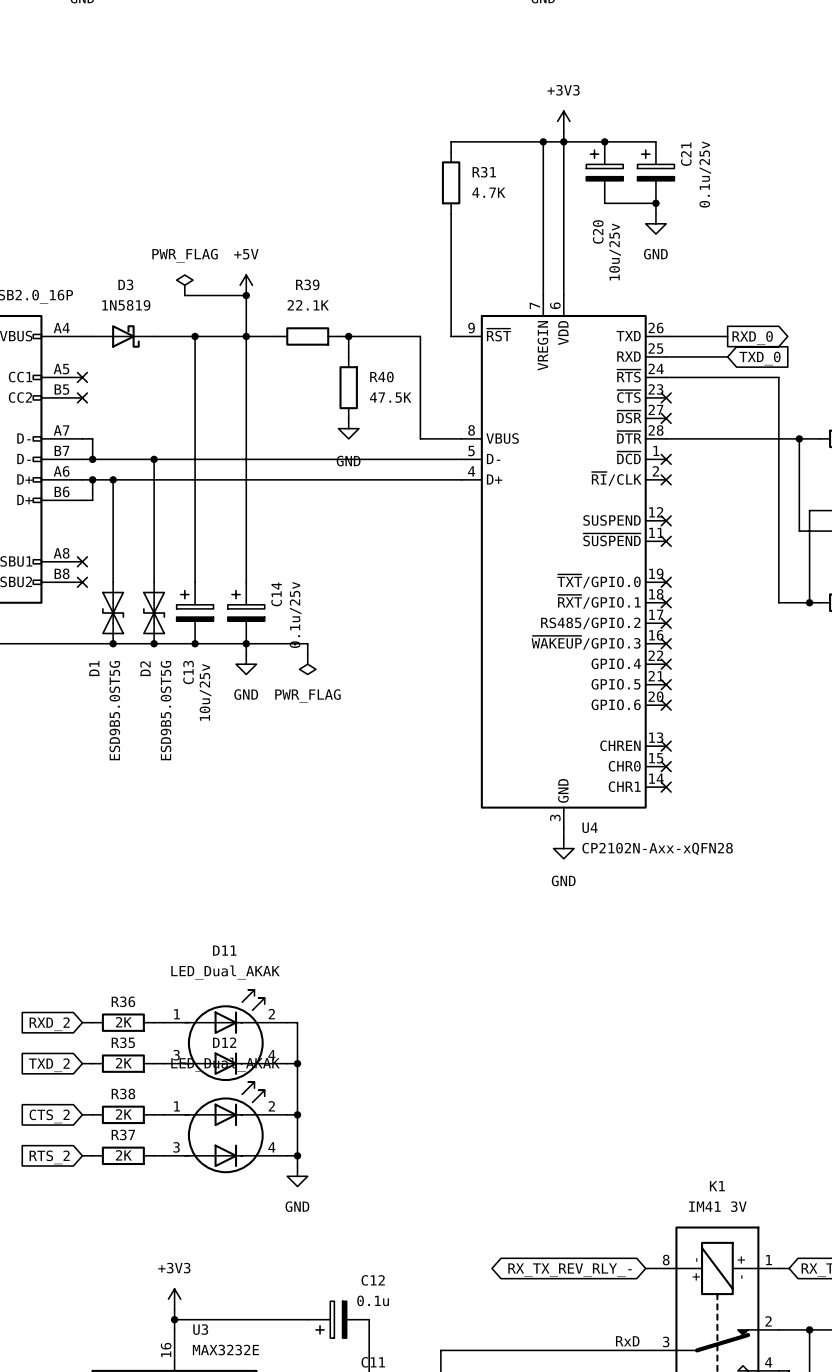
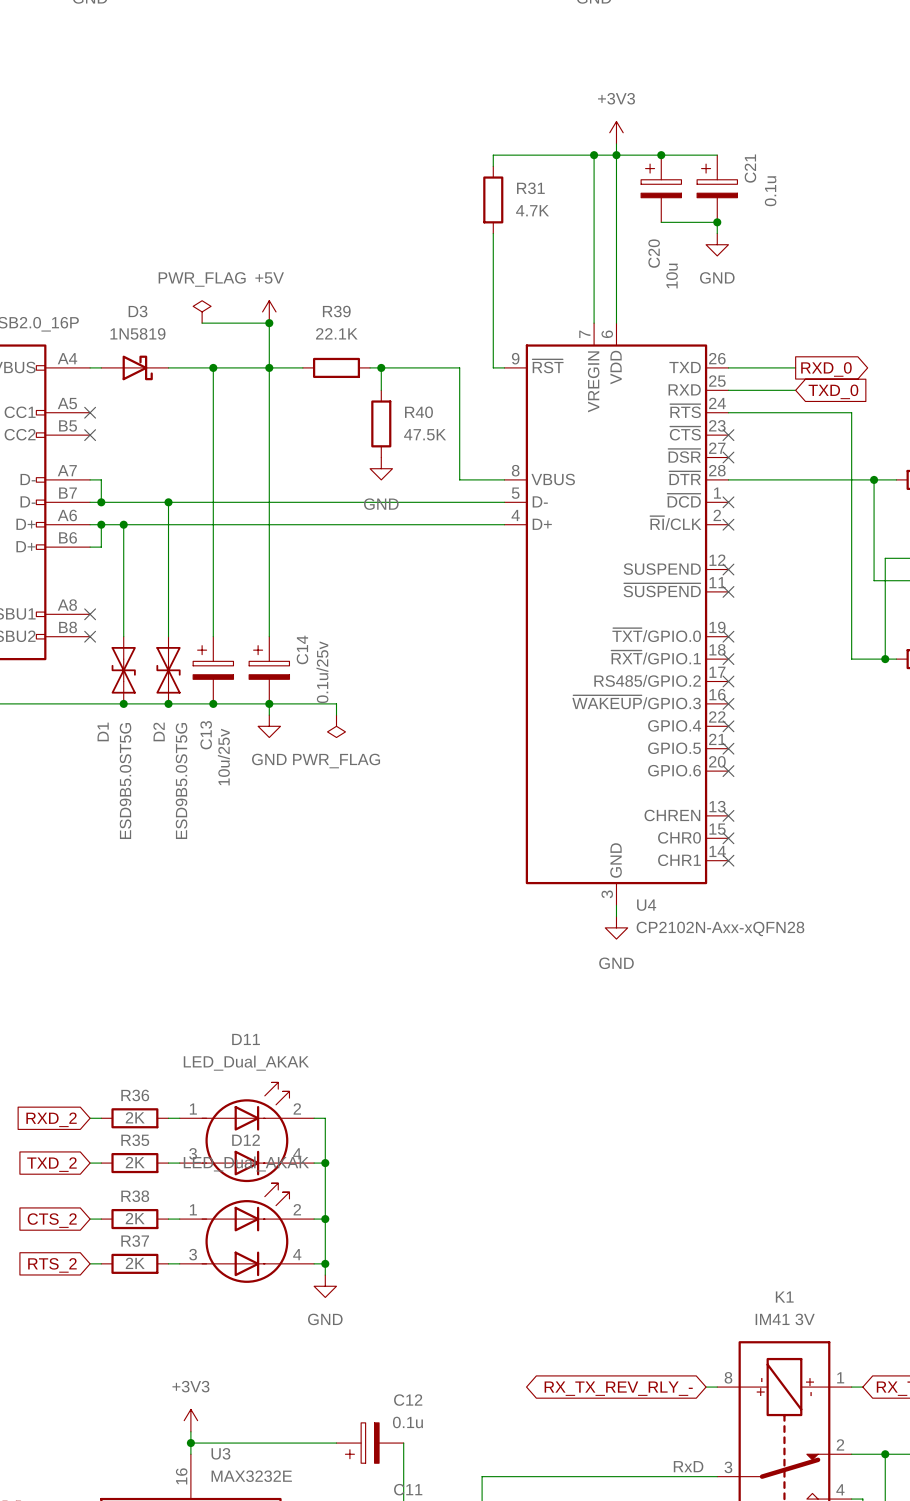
C21 value: 0.1u/25v (705, 174) -> 0.1u (770, 191)
C20 value: 10u/25v (615, 251) -> 10u (672, 276)

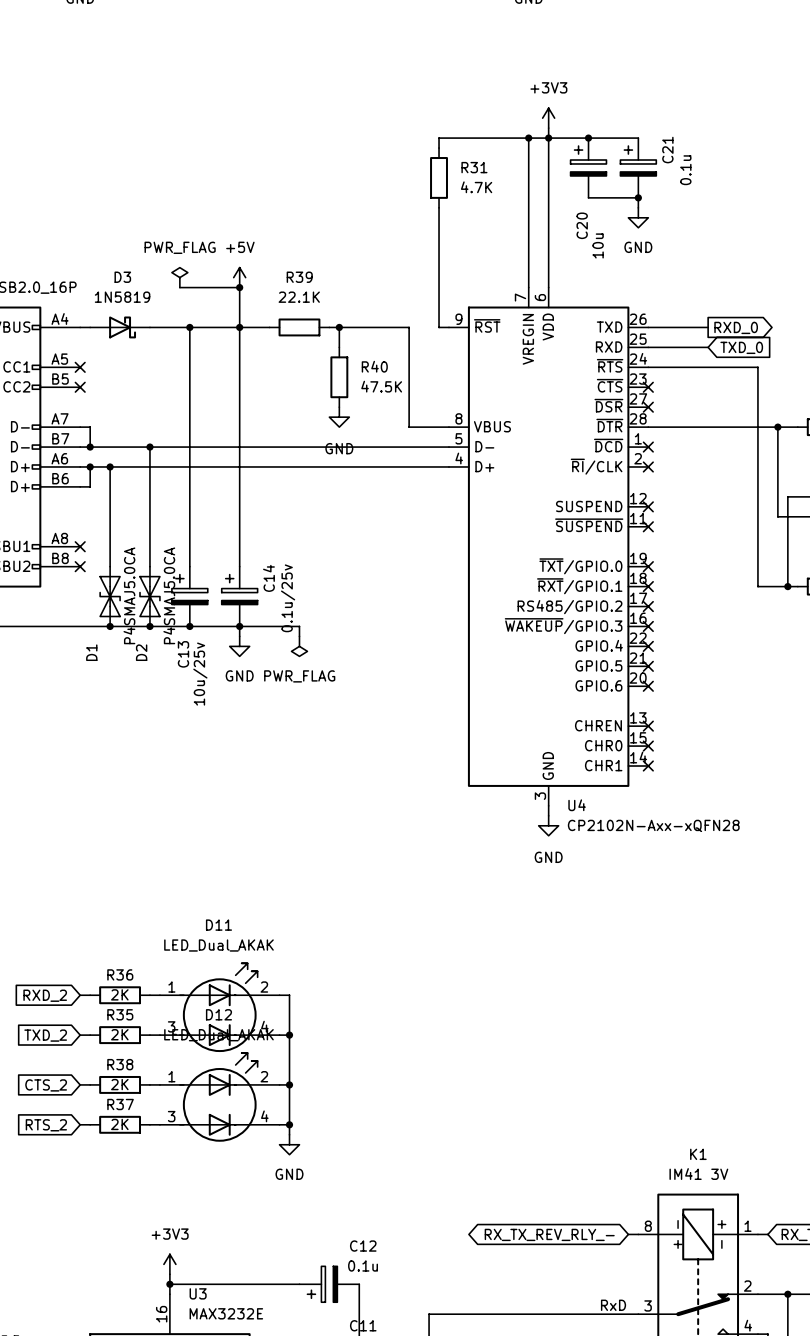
D1 value: ESD9B5.0ST5G (125, 781) -> P4SMAJ5.0CA (129, 595)
D2 value: ESD9B5.0ST5G (181, 781) -> P4SMAJ5.0CA (169, 595)

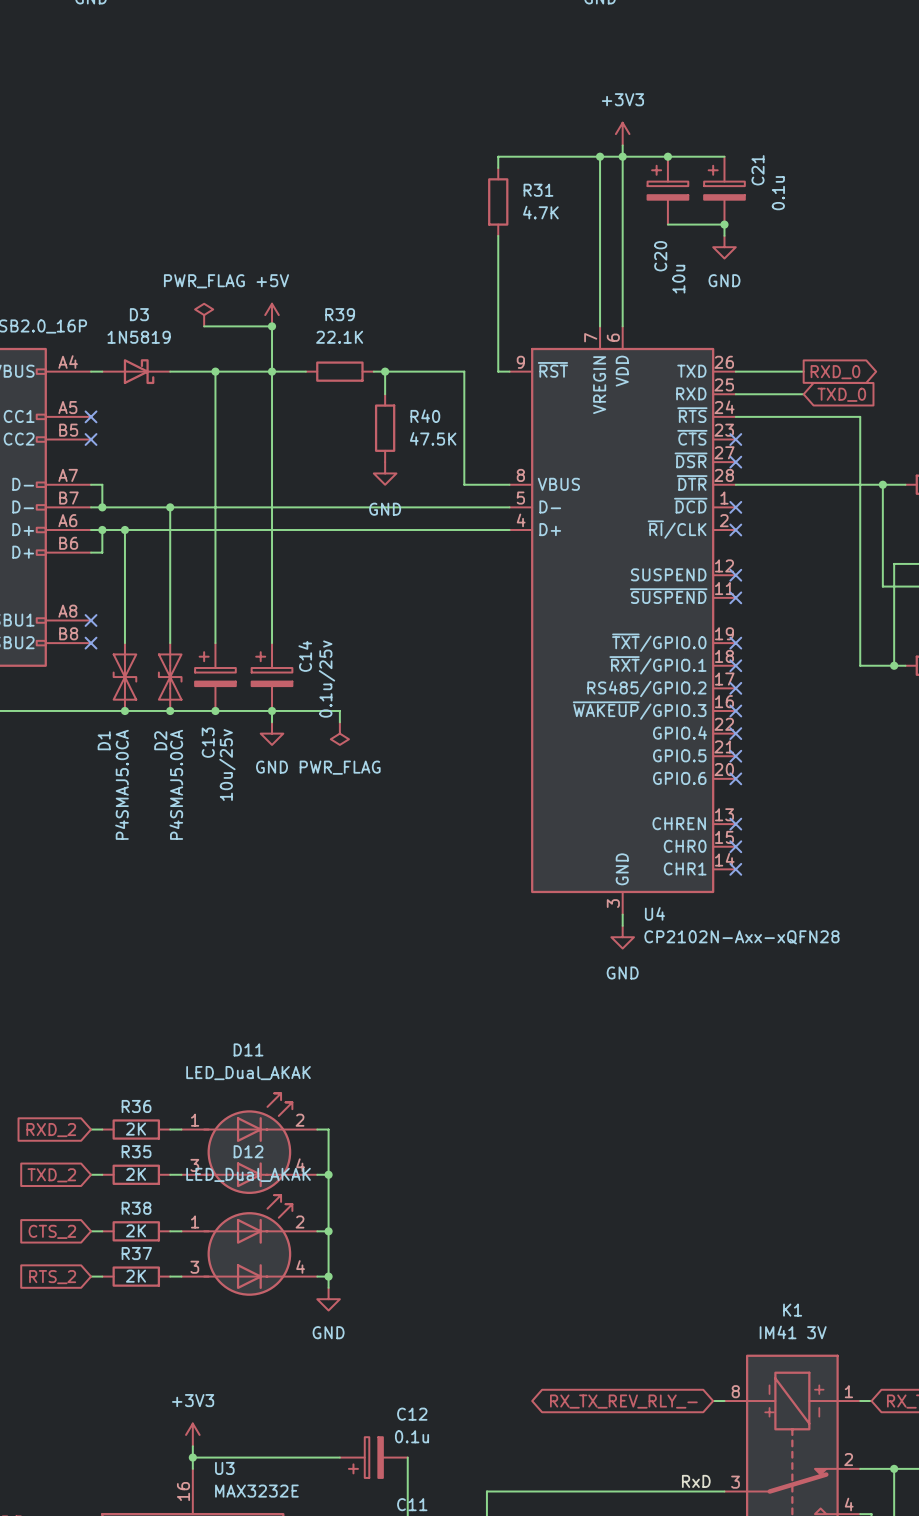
D1 value position: P4SMAJ5.0CA (129, 595) -> P4SMAJ5.0CA (122, 784)
D2 value position: P4SMAJ5.0CA (169, 595) -> P4SMAJ5.0CA (176, 784)

